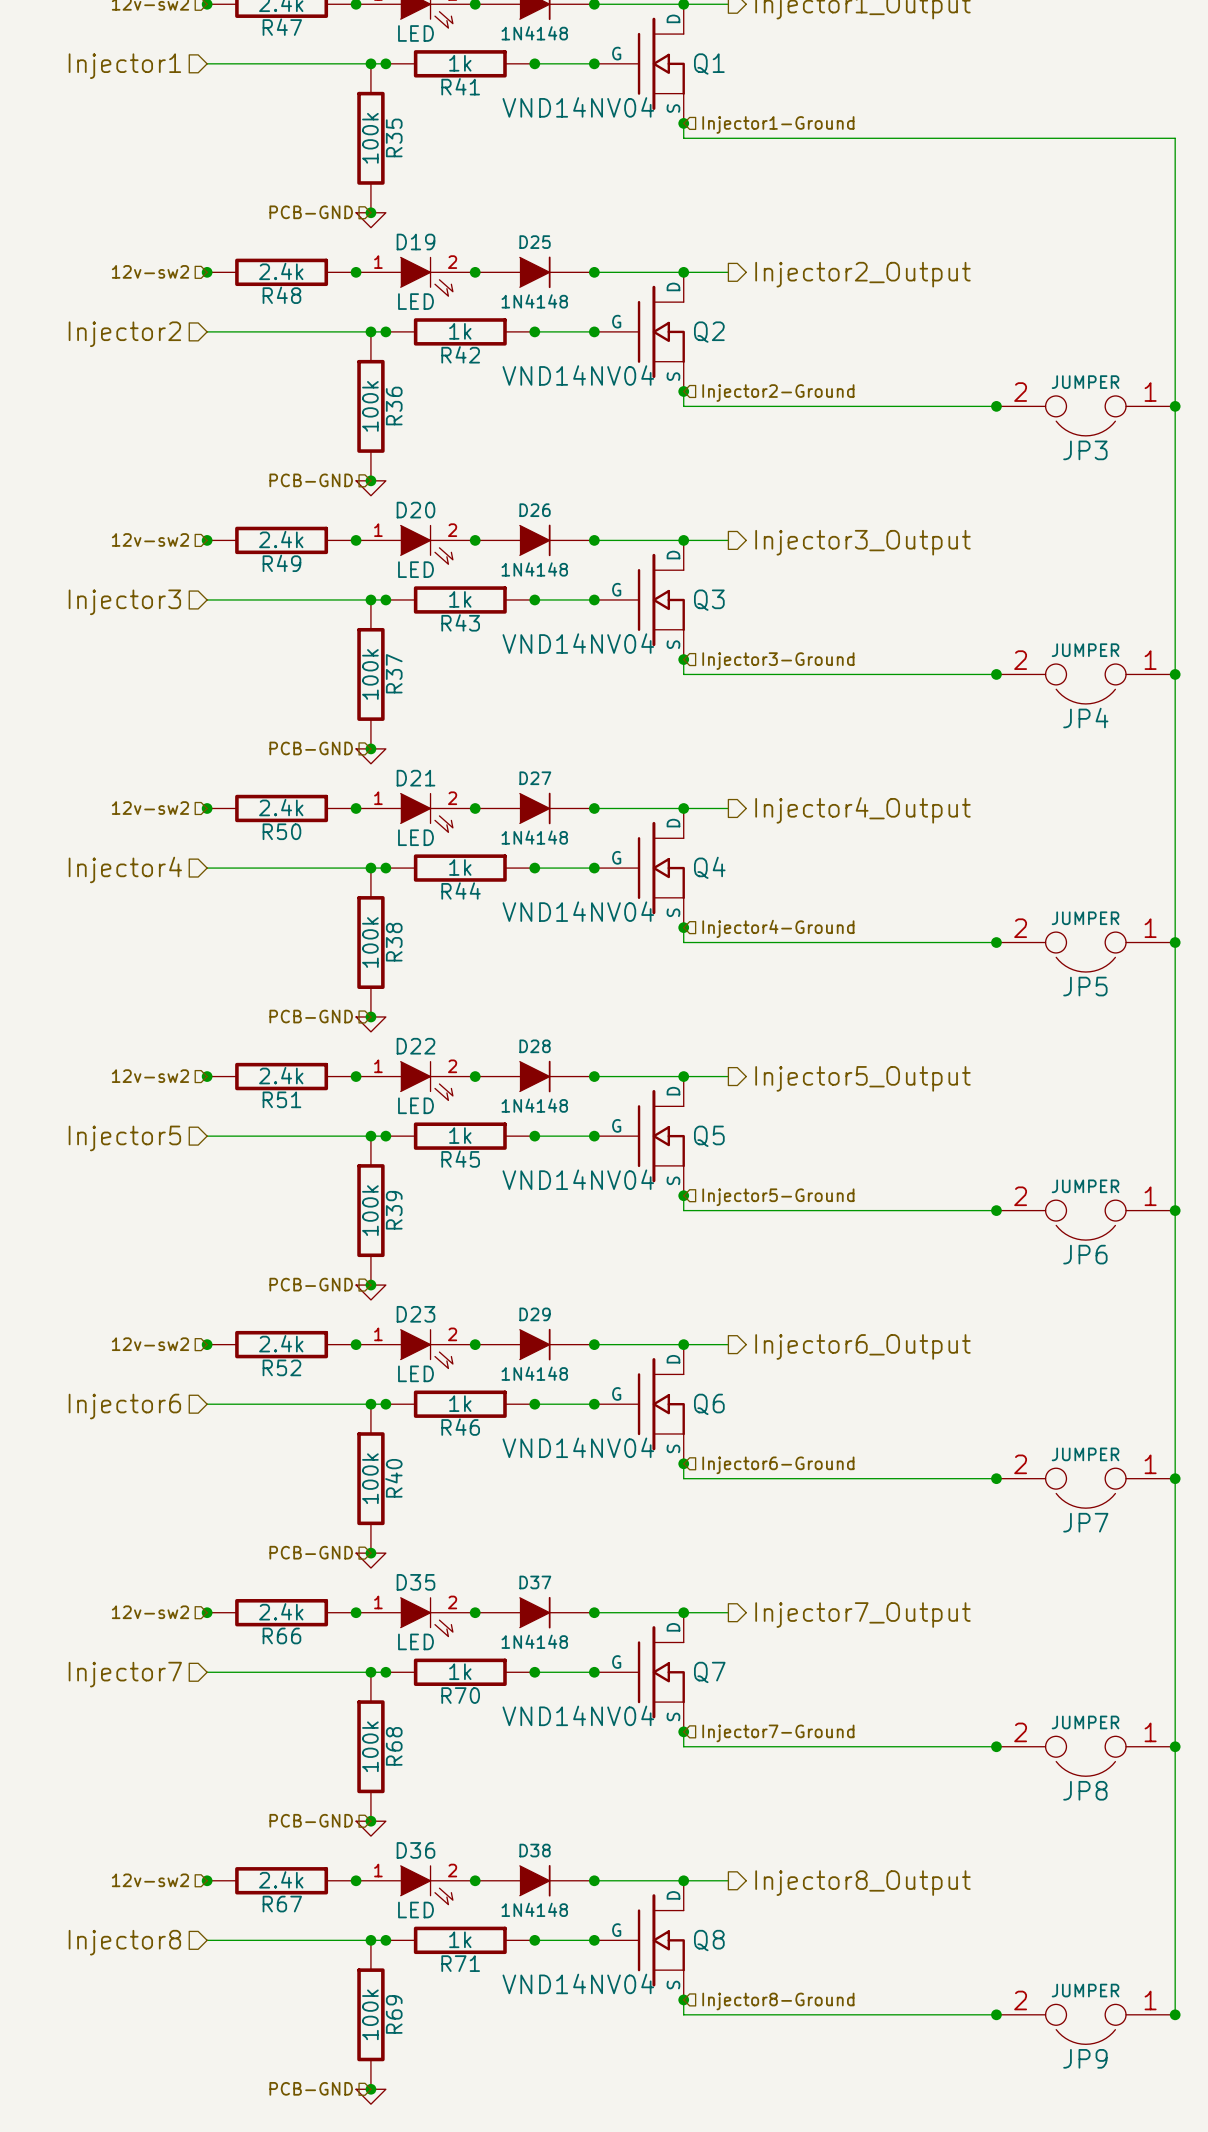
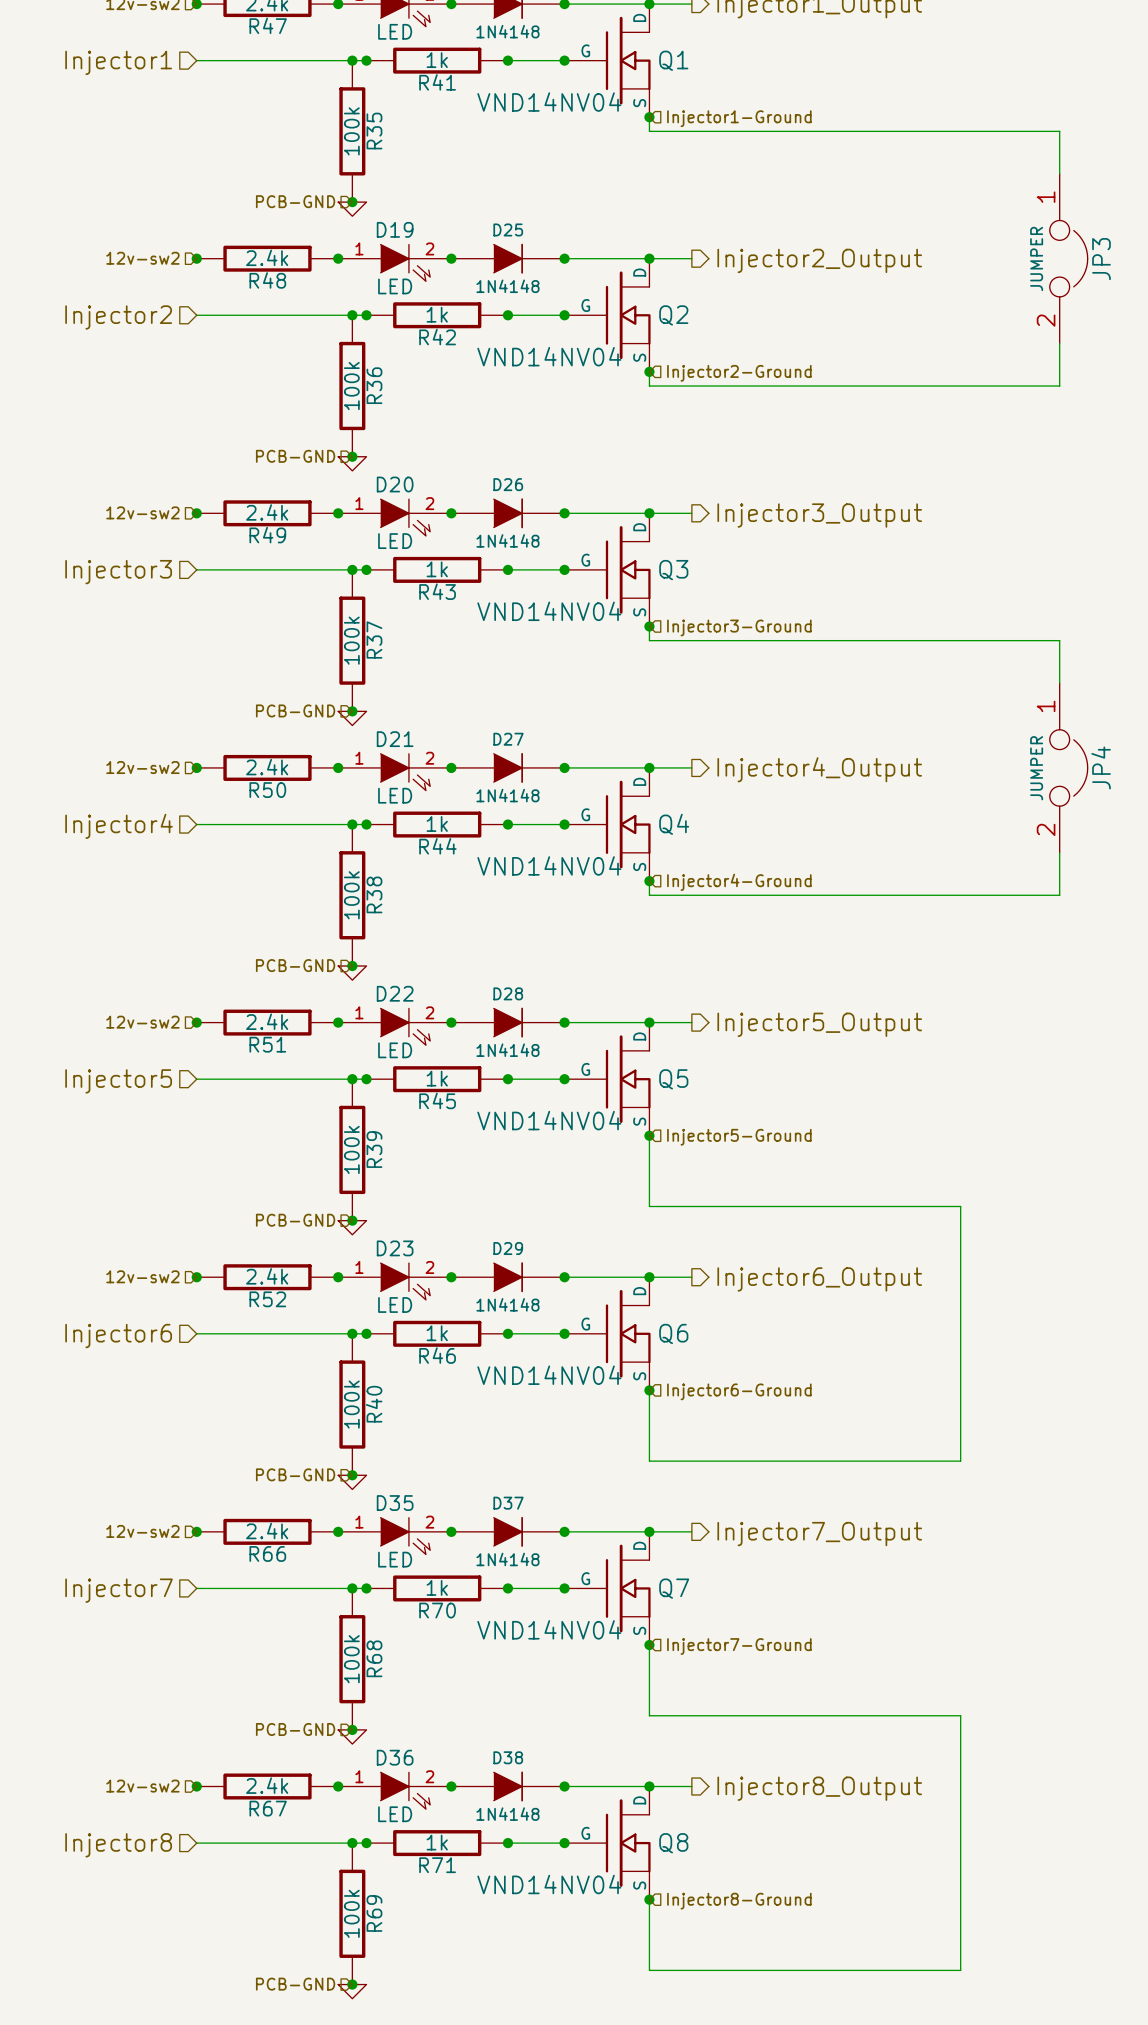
wire: (1115, 138) (1175, 138) (1175, 2014) -> (1059, 131) (1059, 173)
wire: none -> (1059, 343) (1059, 386) (946, 386)
junction: (996, 406) -> none
junction: (1175, 406) -> none
JP3 rotation: 0° (1085, 415) -> 90° counterclockwise (1068, 258)
JP3 position: (1085, 415) -> (1068, 258)
wire: none -> (946, 640) (1059, 640) (1059, 683)
junction: (996, 674) -> none
junction: (1175, 674) -> none
JP4 rotation: 0° (1085, 683) -> 90° counterclockwise (1068, 767)
JP4 position: (1085, 683) -> (1068, 767)
wire: none -> (1059, 852) (1059, 895) (946, 895)
junction: (996, 942) -> none
junction: (1175, 942) -> none
JP5: JUMPER (1085, 952) -> none
wire: (683, 1210) (996, 1210) -> (649, 1149) (649, 1206) (960, 1206) (960, 1461) (649, 1461) (649, 1404)
junction: (996, 1210) -> none
junction: (1175, 1210) -> none
JP6: JUMPER (1085, 1220) -> none
wire: (683, 1478) (996, 1478) -> none
junction: (996, 1478) -> none
junction: (1175, 1478) -> none
JP7: JUMPER (1085, 1488) -> none
wire: (683, 1746) (996, 1746) -> (649, 1659) (649, 1715) (960, 1715) (960, 1970) (649, 1970) (649, 1913)
junction: (996, 1746) -> none
junction: (1175, 1746) -> none
JP8: JUMPER (1085, 1756) -> none
wire: (683, 2014) (996, 2014) -> none
junction: (996, 2014) -> none
junction: (1175, 2014) -> none
JP9: JUMPER (1085, 2024) -> none

